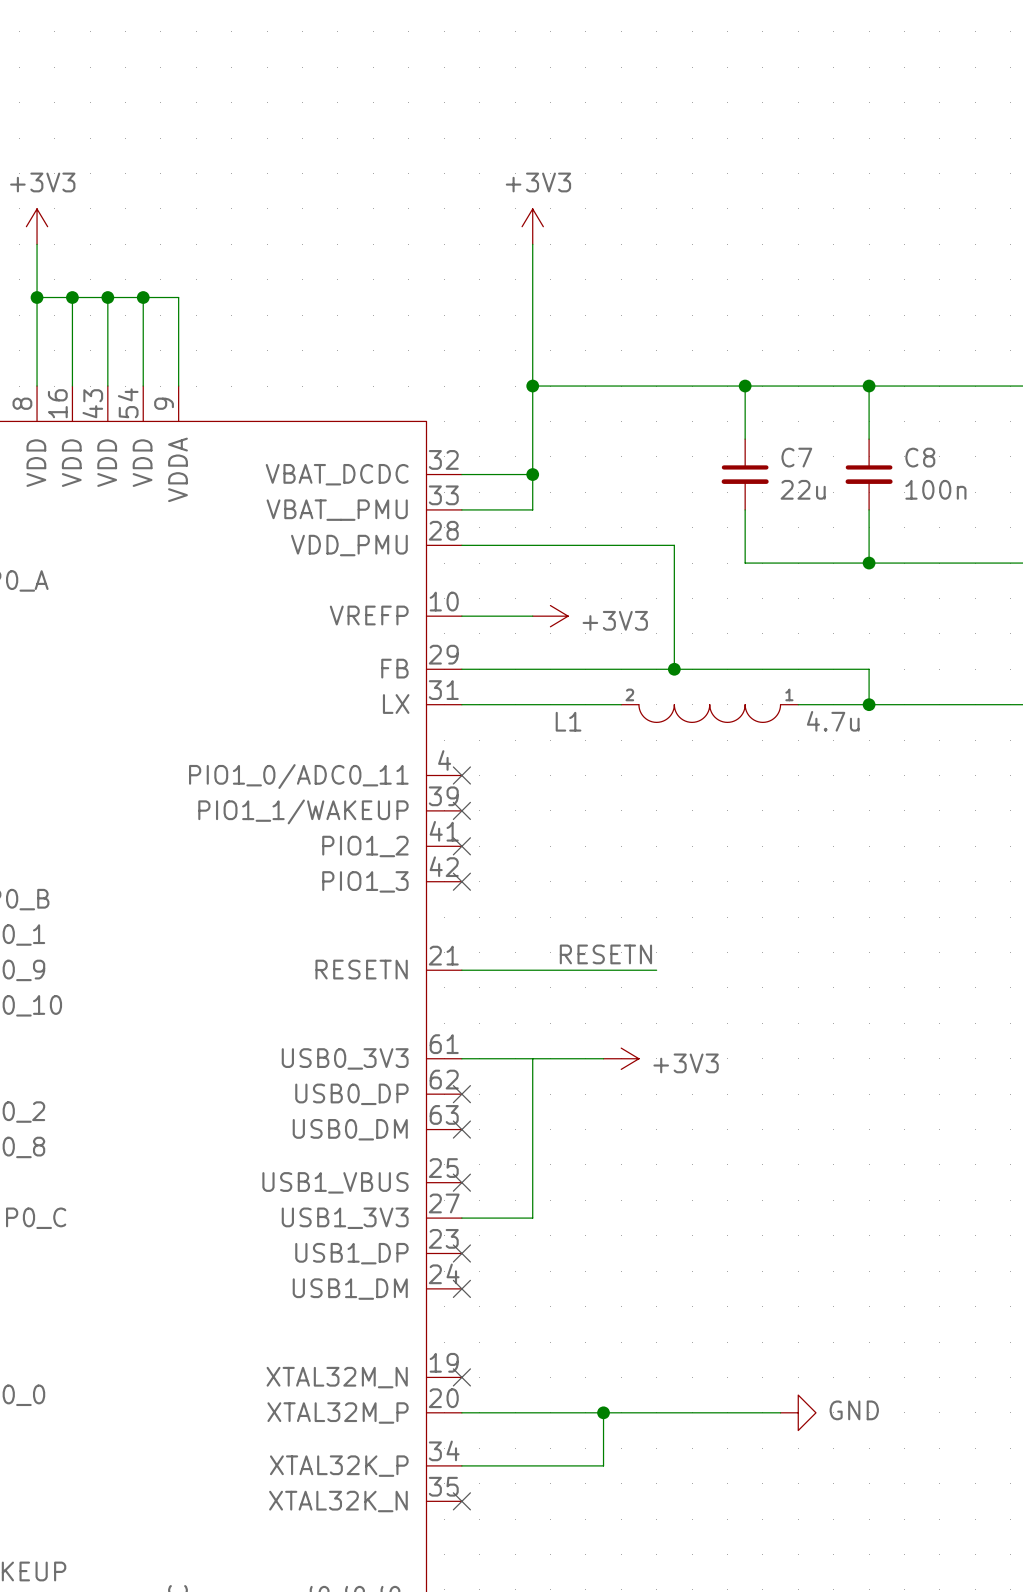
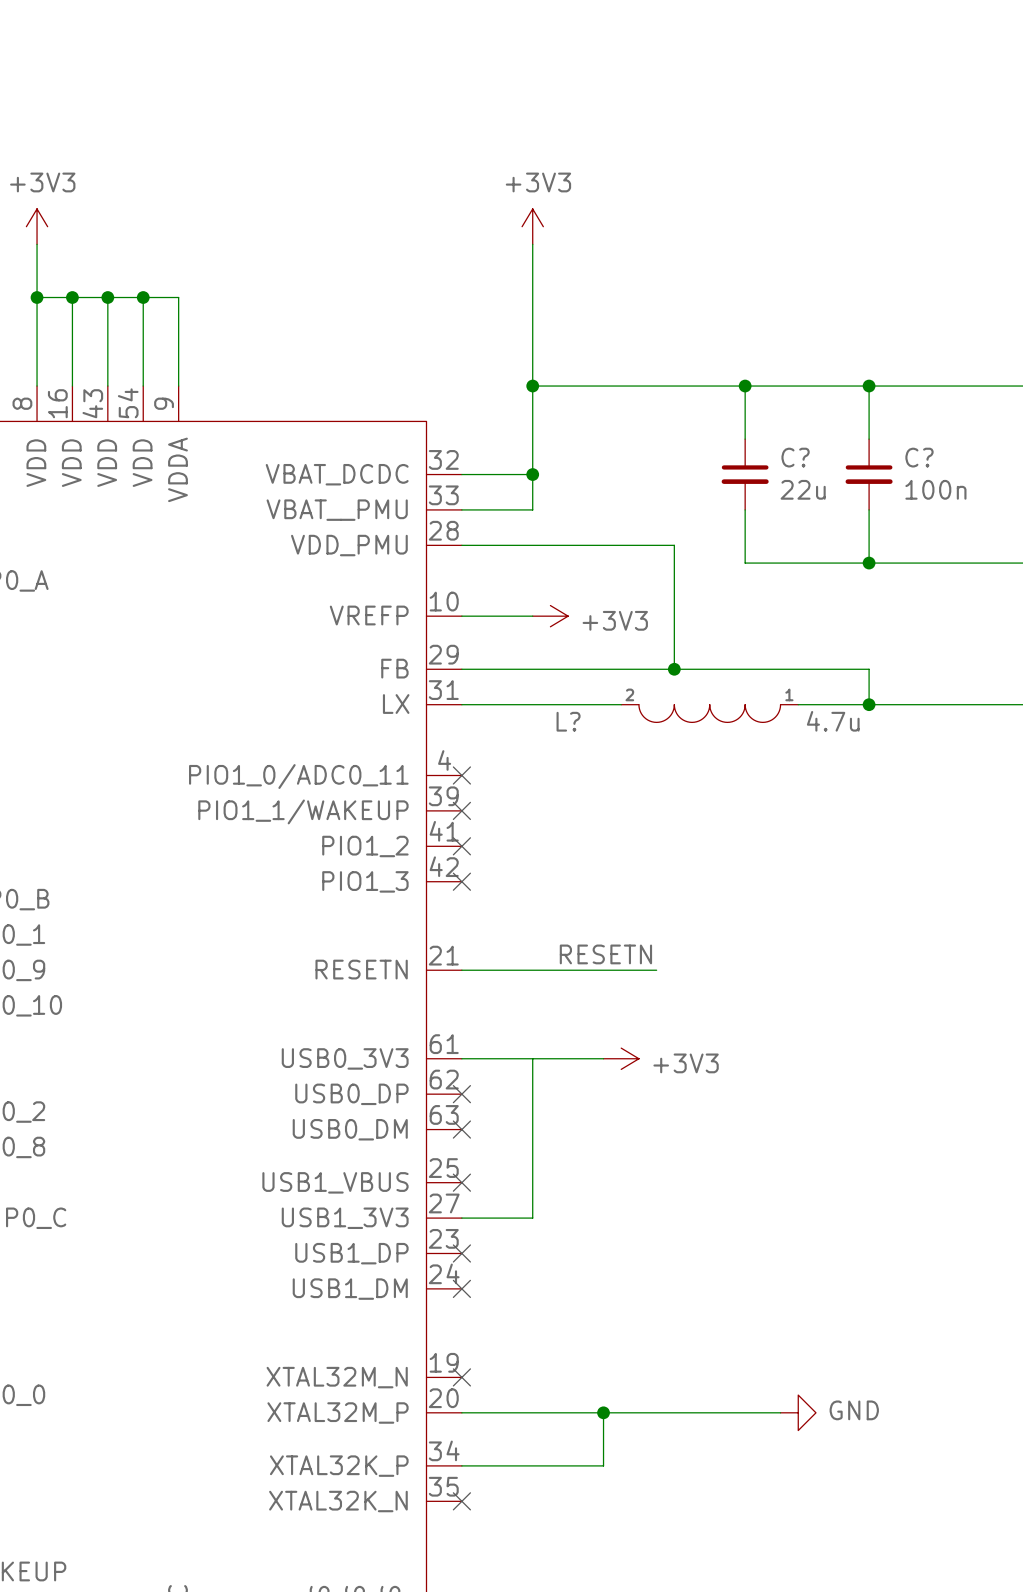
C7 name: C7 (796, 457) -> C? (795, 457)
C8 name: C8 (920, 457) -> C? (919, 457)
L1 name: L1 (568, 721) -> L? (568, 721)

